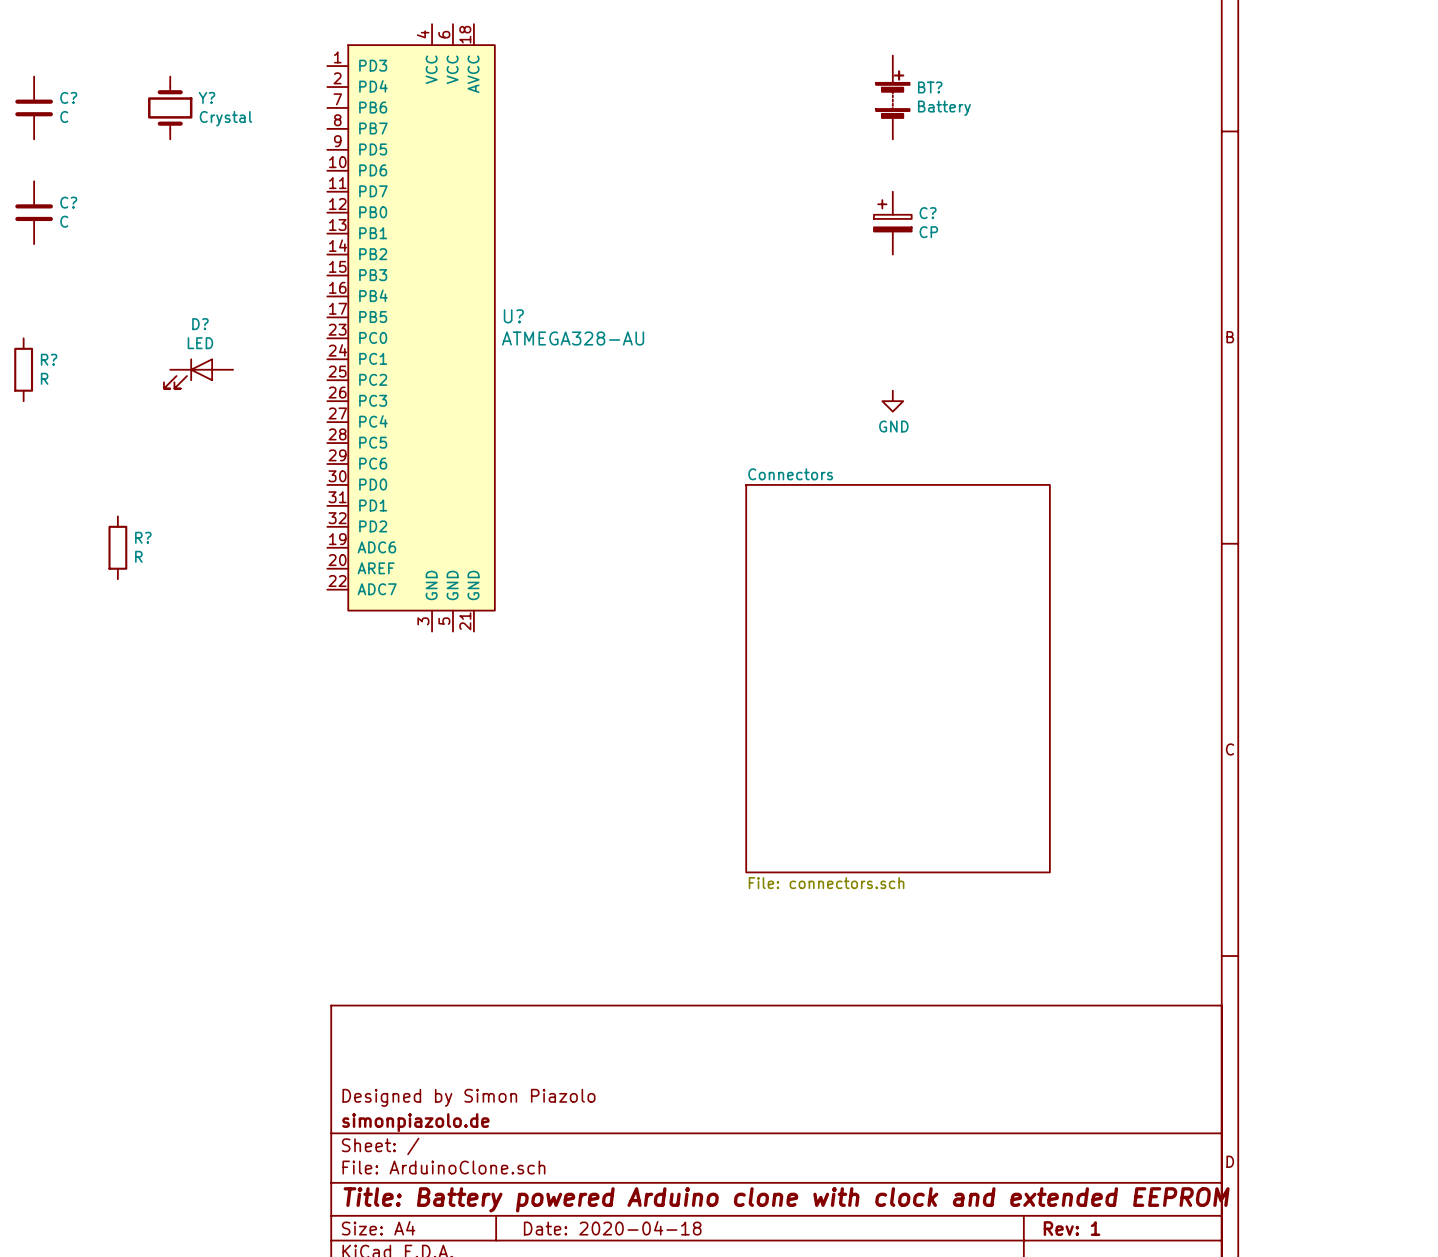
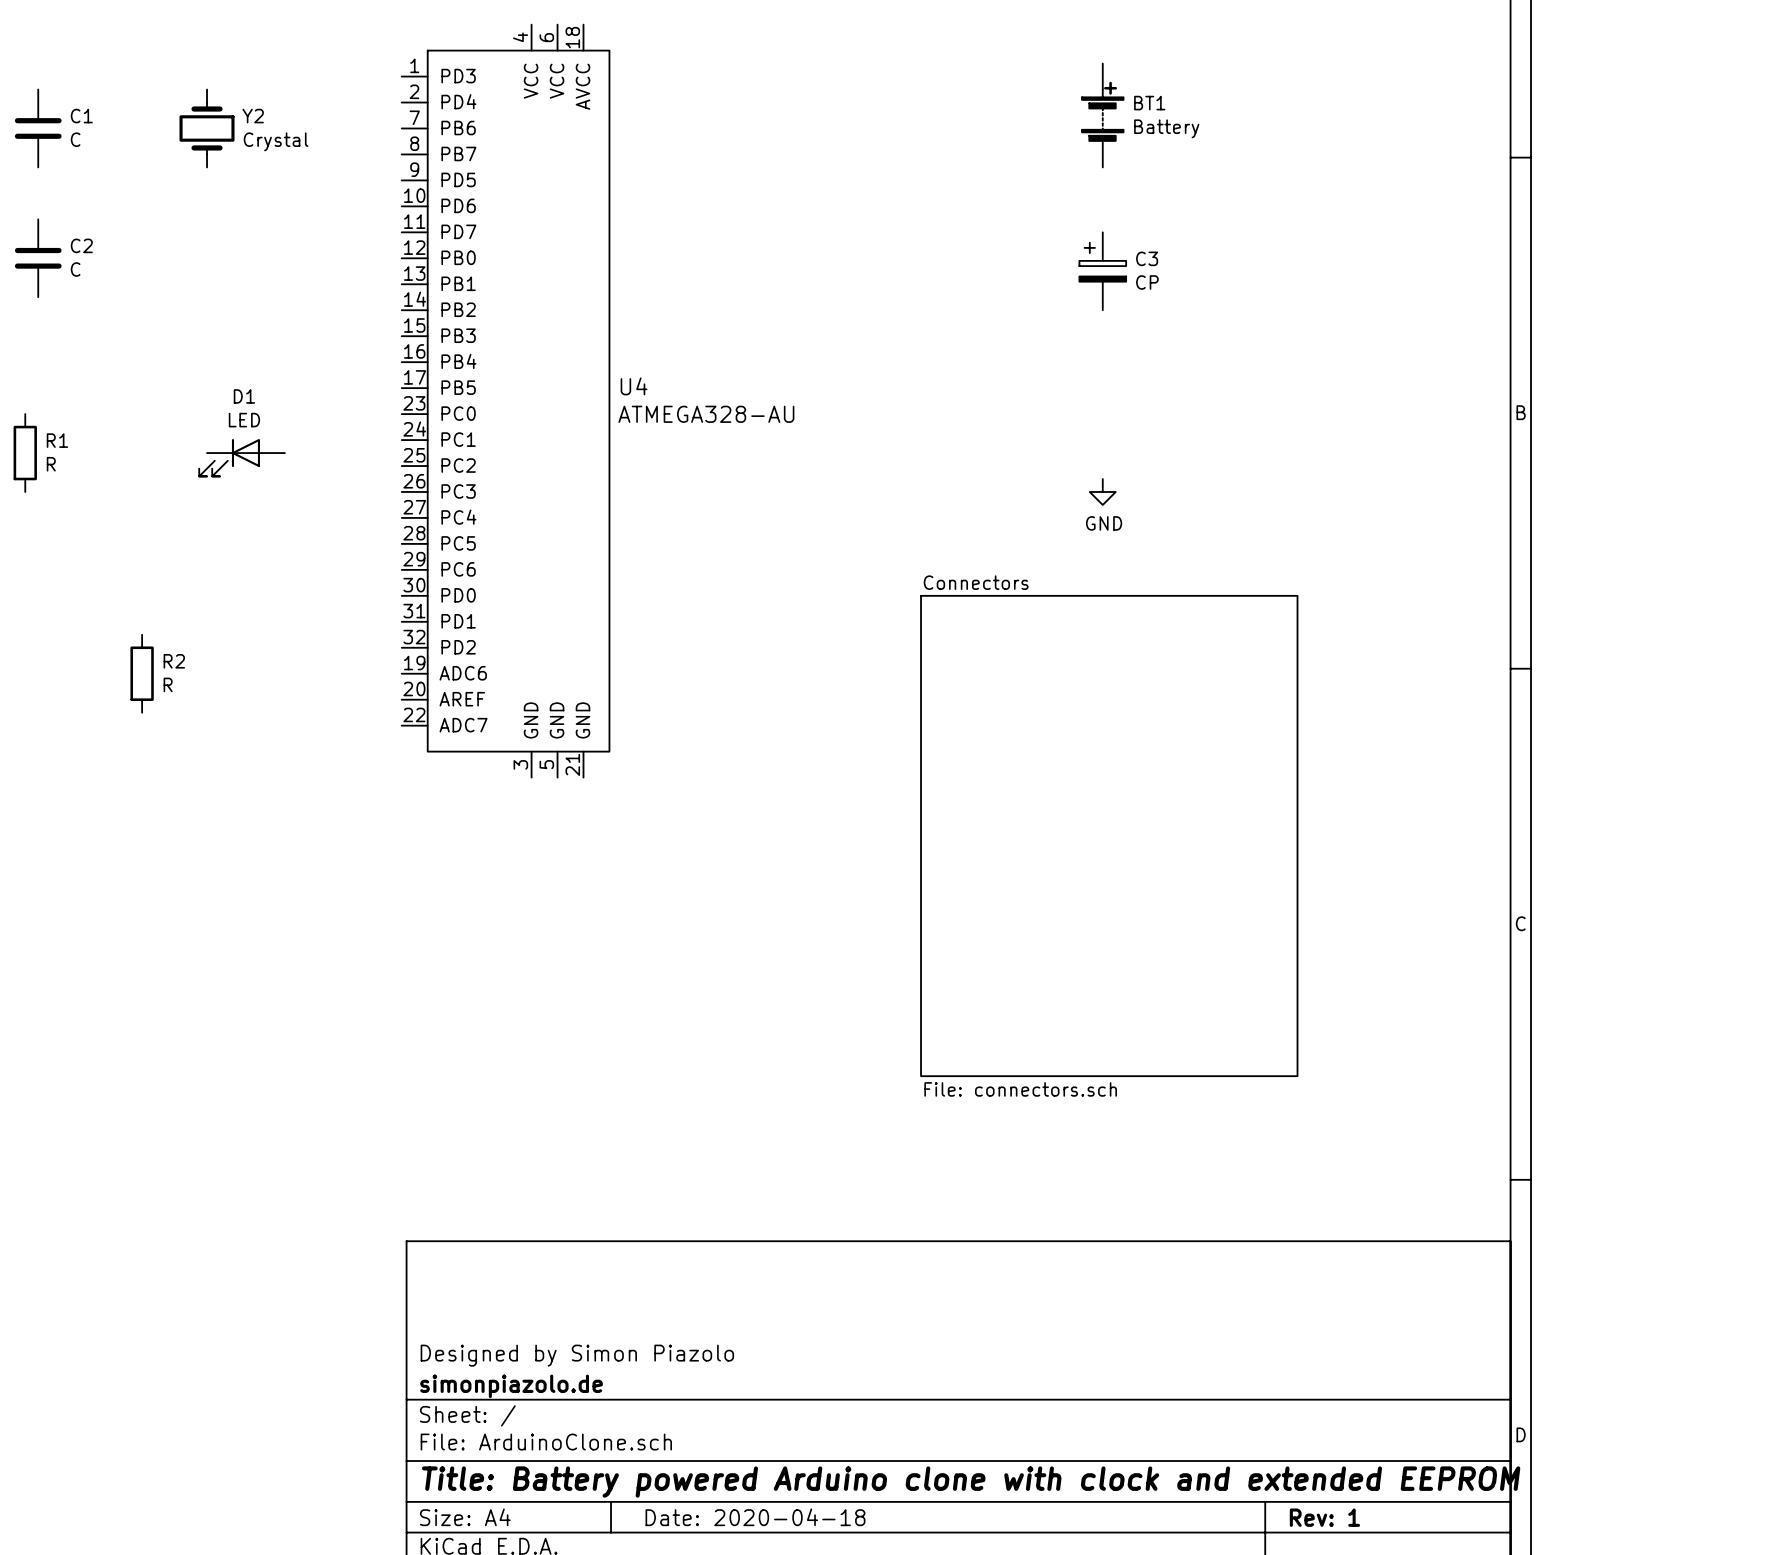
BT? name: BT? (930, 87) -> BT1 (1149, 103)
C? name: C? (68, 97) -> C1 (81, 116)
Y? name: Y? (206, 97) -> Y2 (253, 116)
C? name: C? (68, 202) -> C2 (81, 245)
C? name: C? (928, 213) -> C3 (1147, 258)
U? name: U? (513, 316) -> U4 (634, 386)
D? name: D? (200, 324) -> D1 (244, 396)
R? name: R? (49, 359) -> R1 (57, 440)
R? name: R? (143, 537) -> R2 (174, 661)

